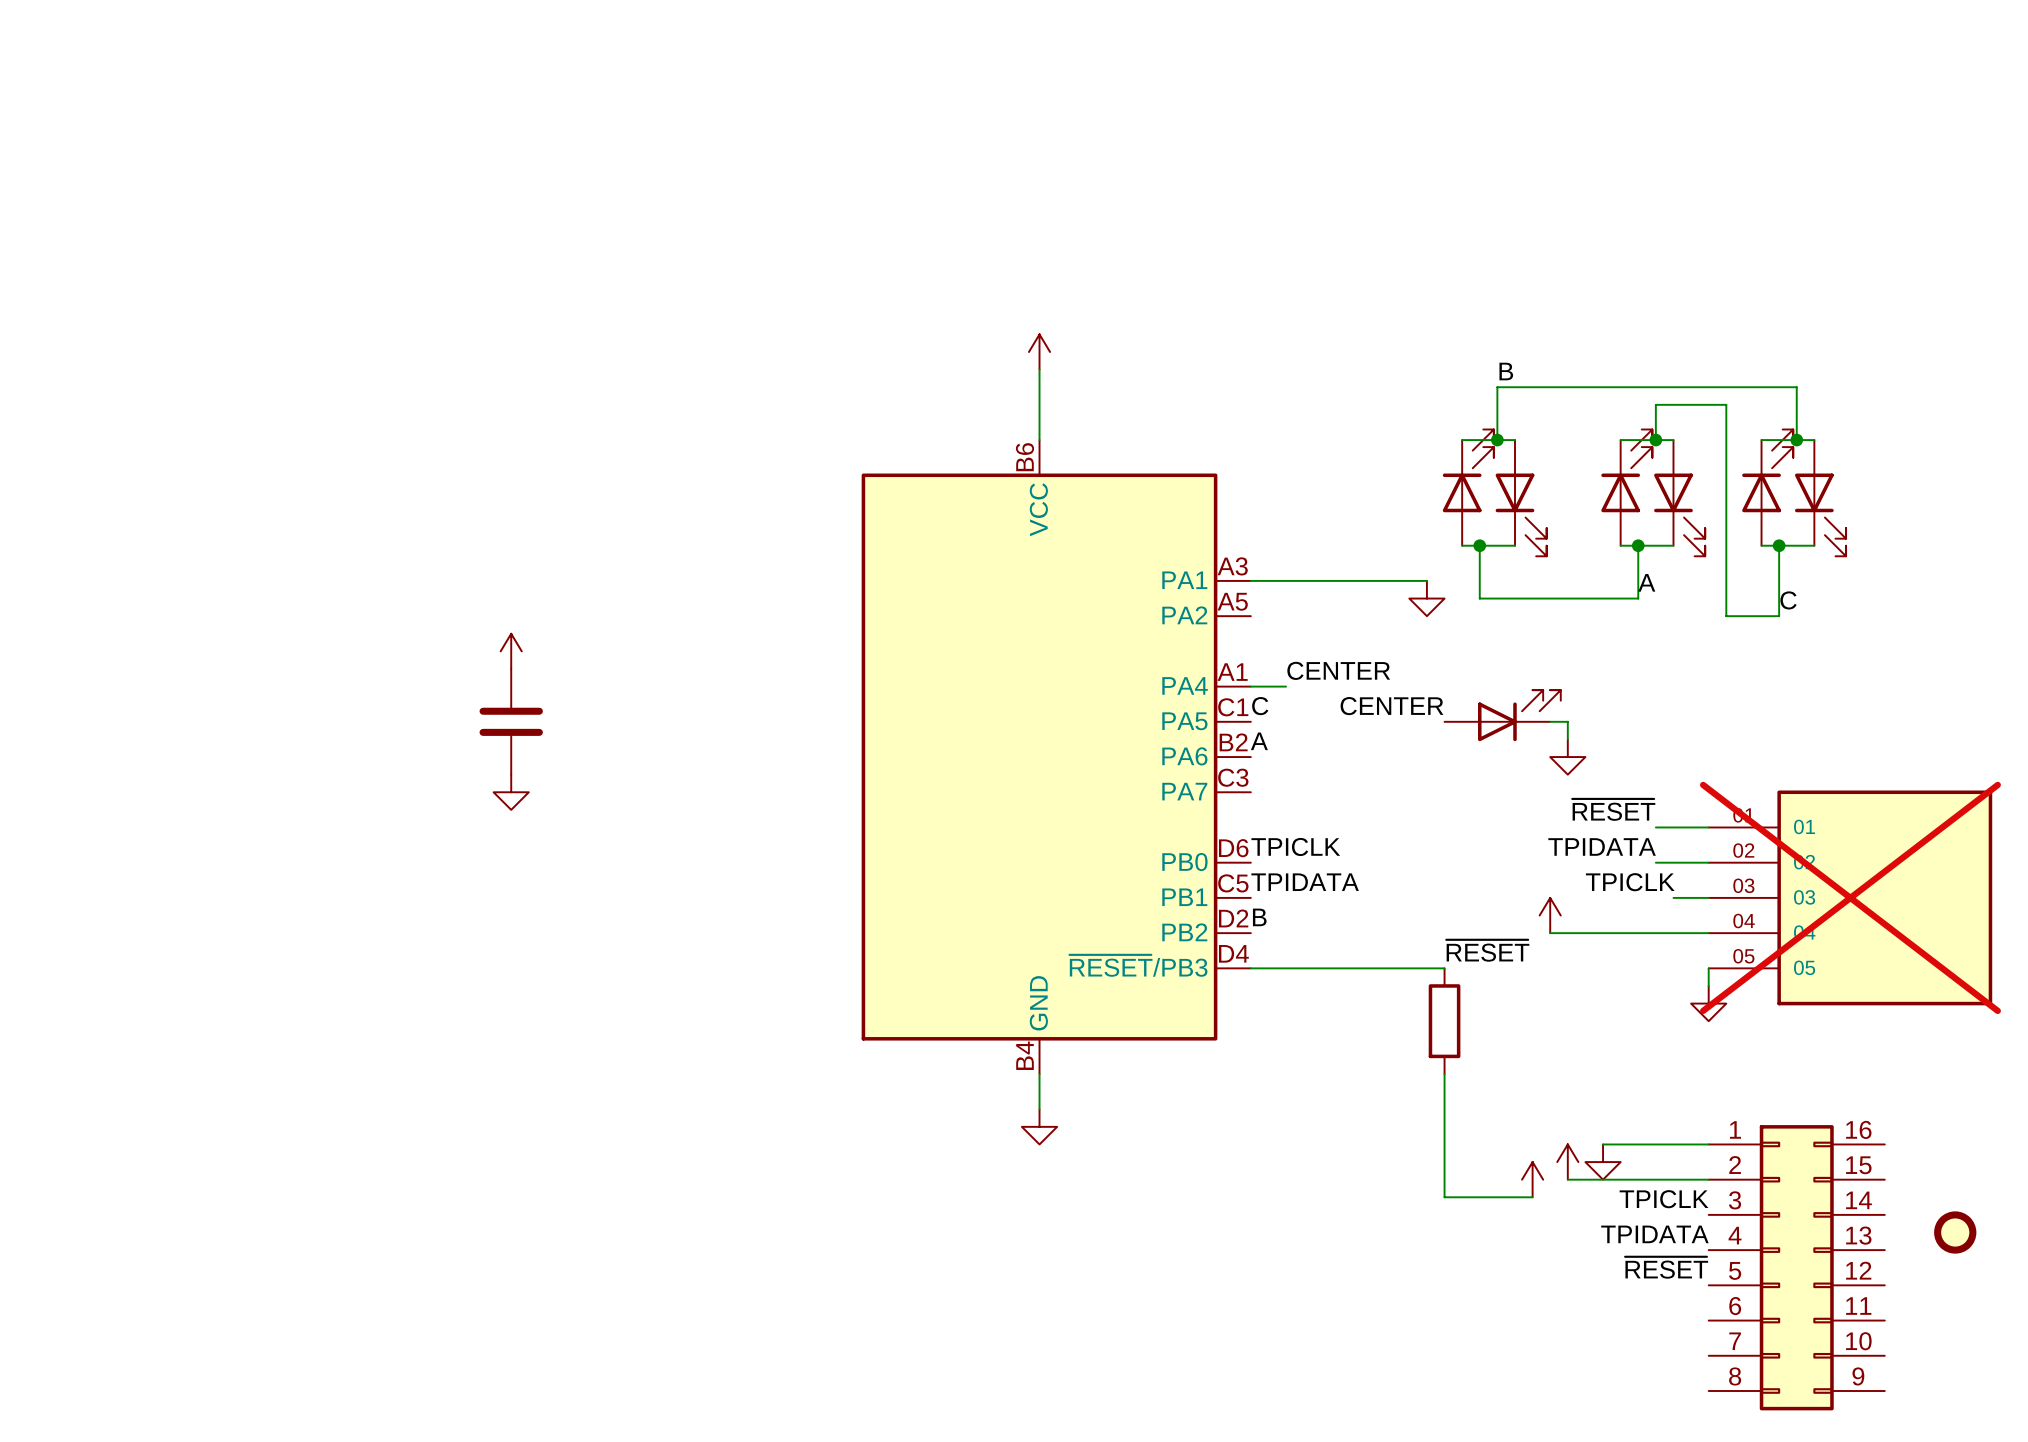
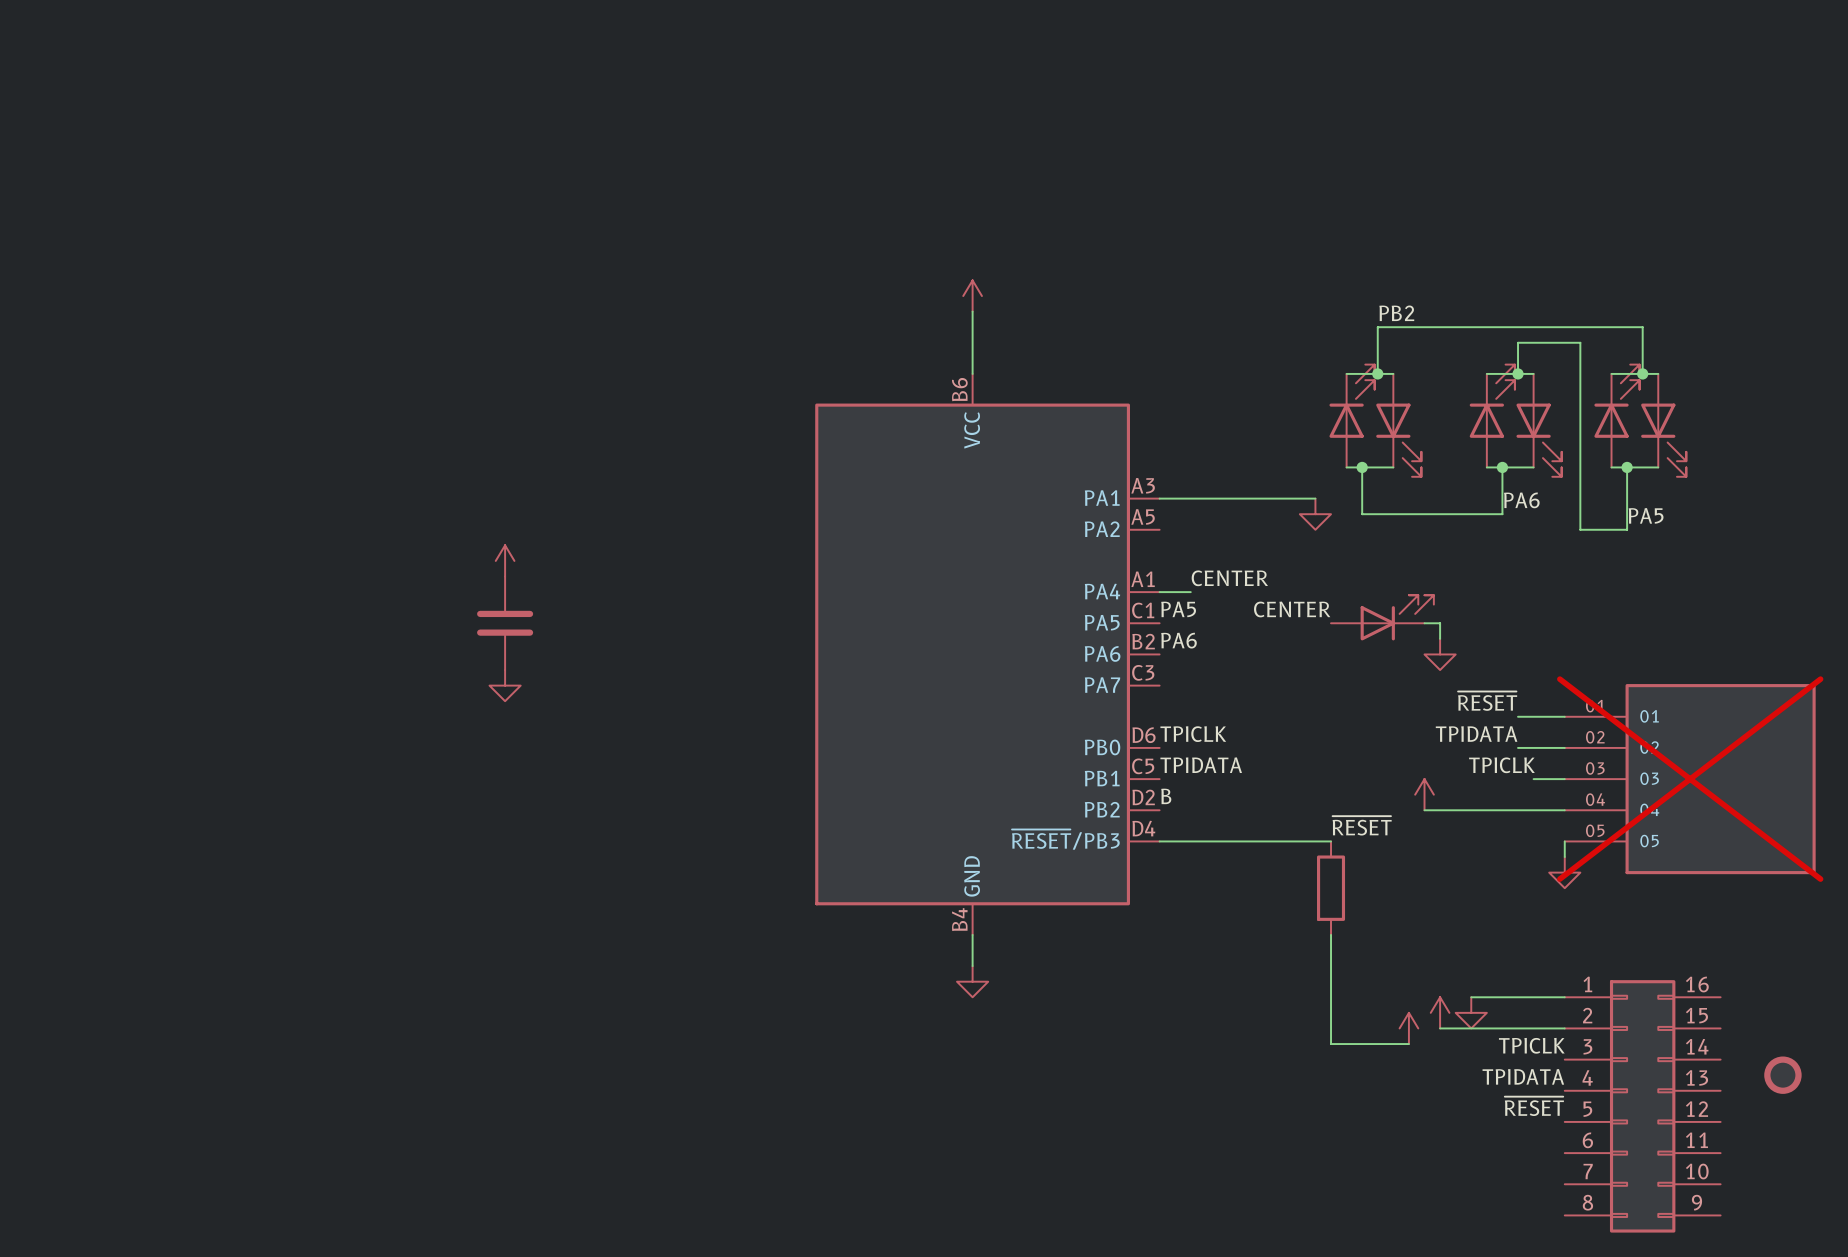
label: B (1506, 371) -> PB2 (1396, 313)
label: A (1646, 582) -> PA6 (1521, 500)
label: C (1788, 600) -> PA5 (1646, 515)
label: C (1260, 706) -> PA5 (1178, 609)
label: A (1259, 741) -> PA6 (1178, 640)

